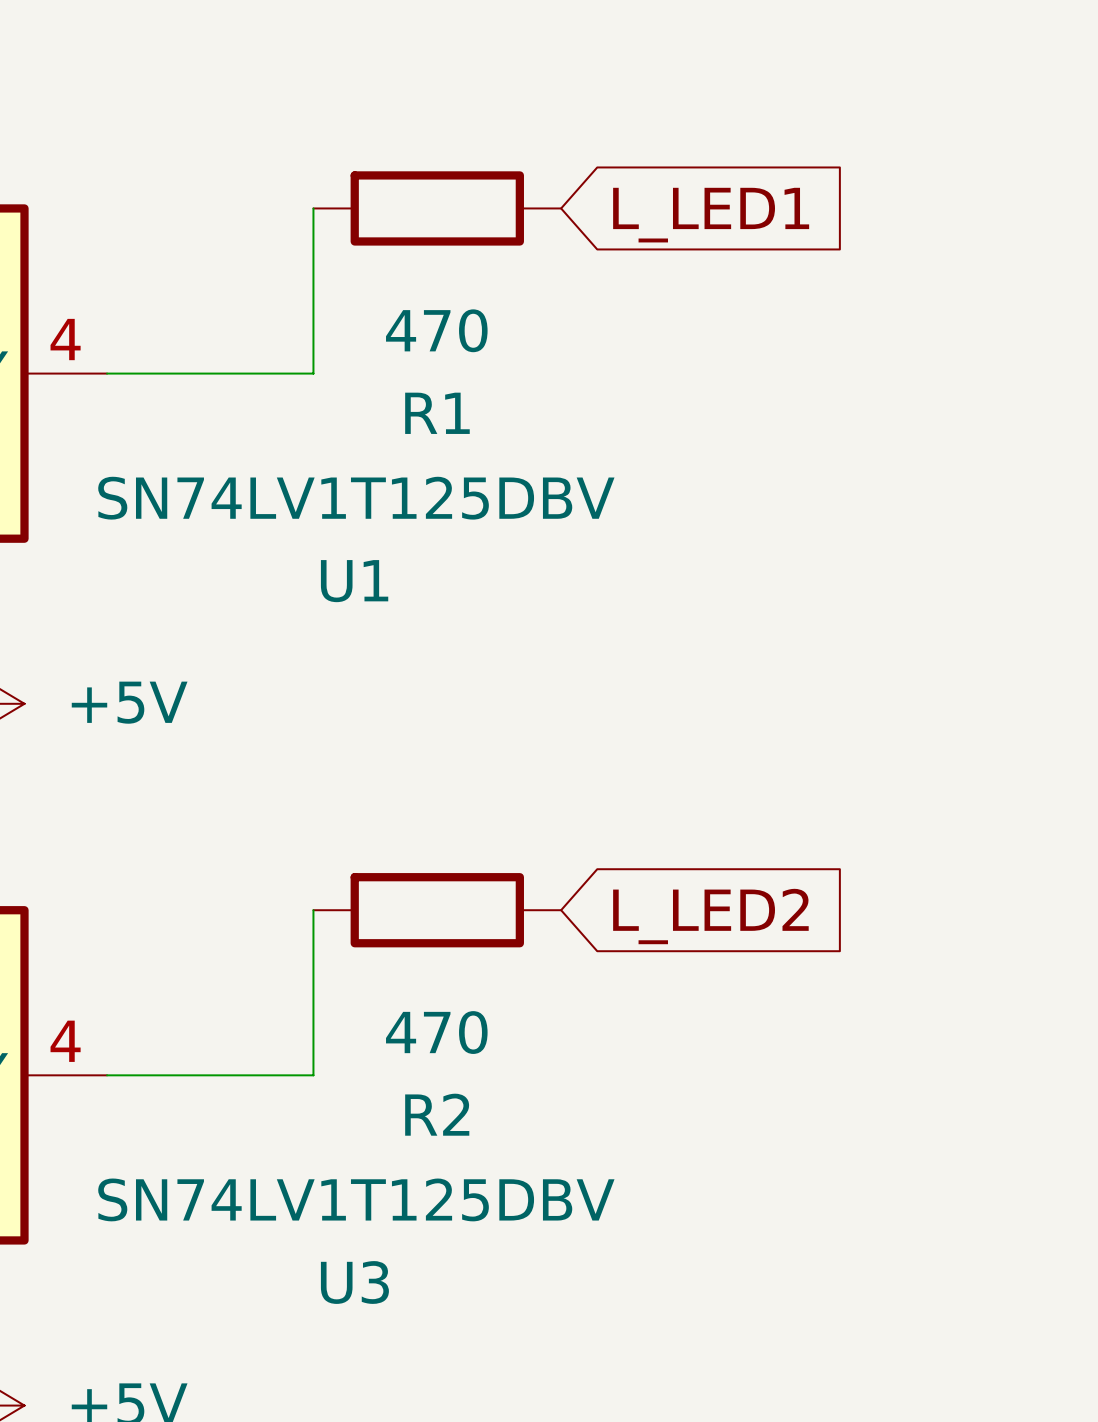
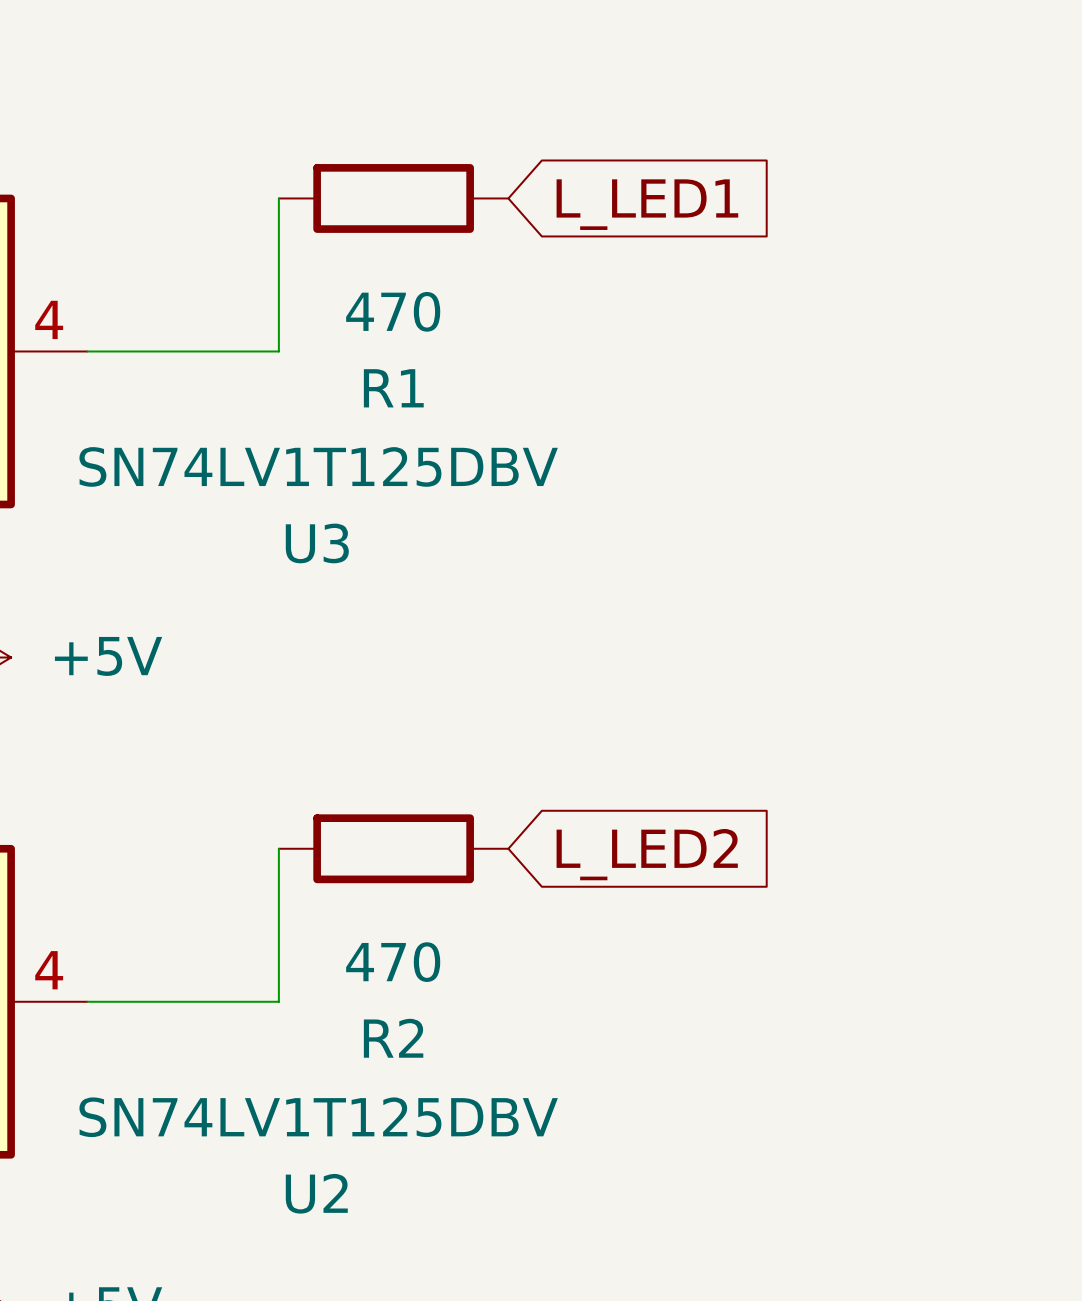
U1 name: U1 (354, 581) -> U3 (317, 543)
U3 name: U3 (354, 1282) -> U2 (316, 1193)

